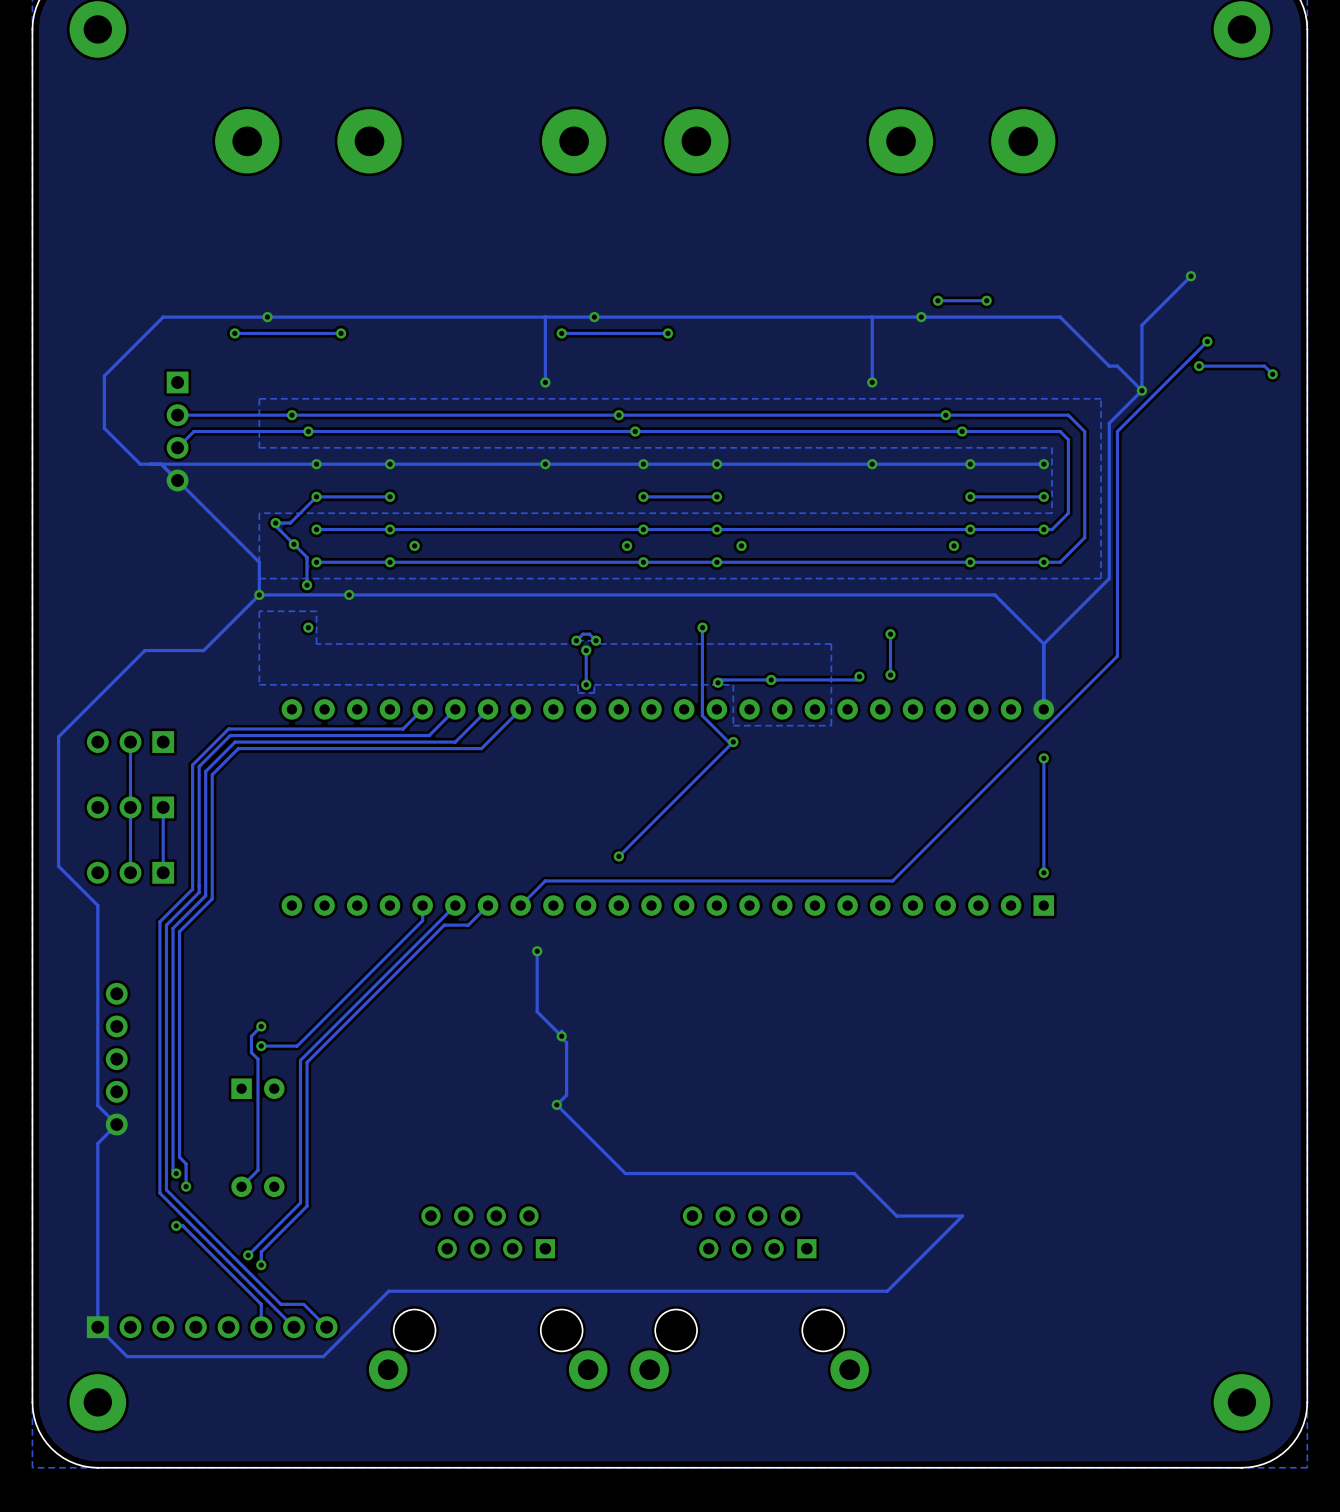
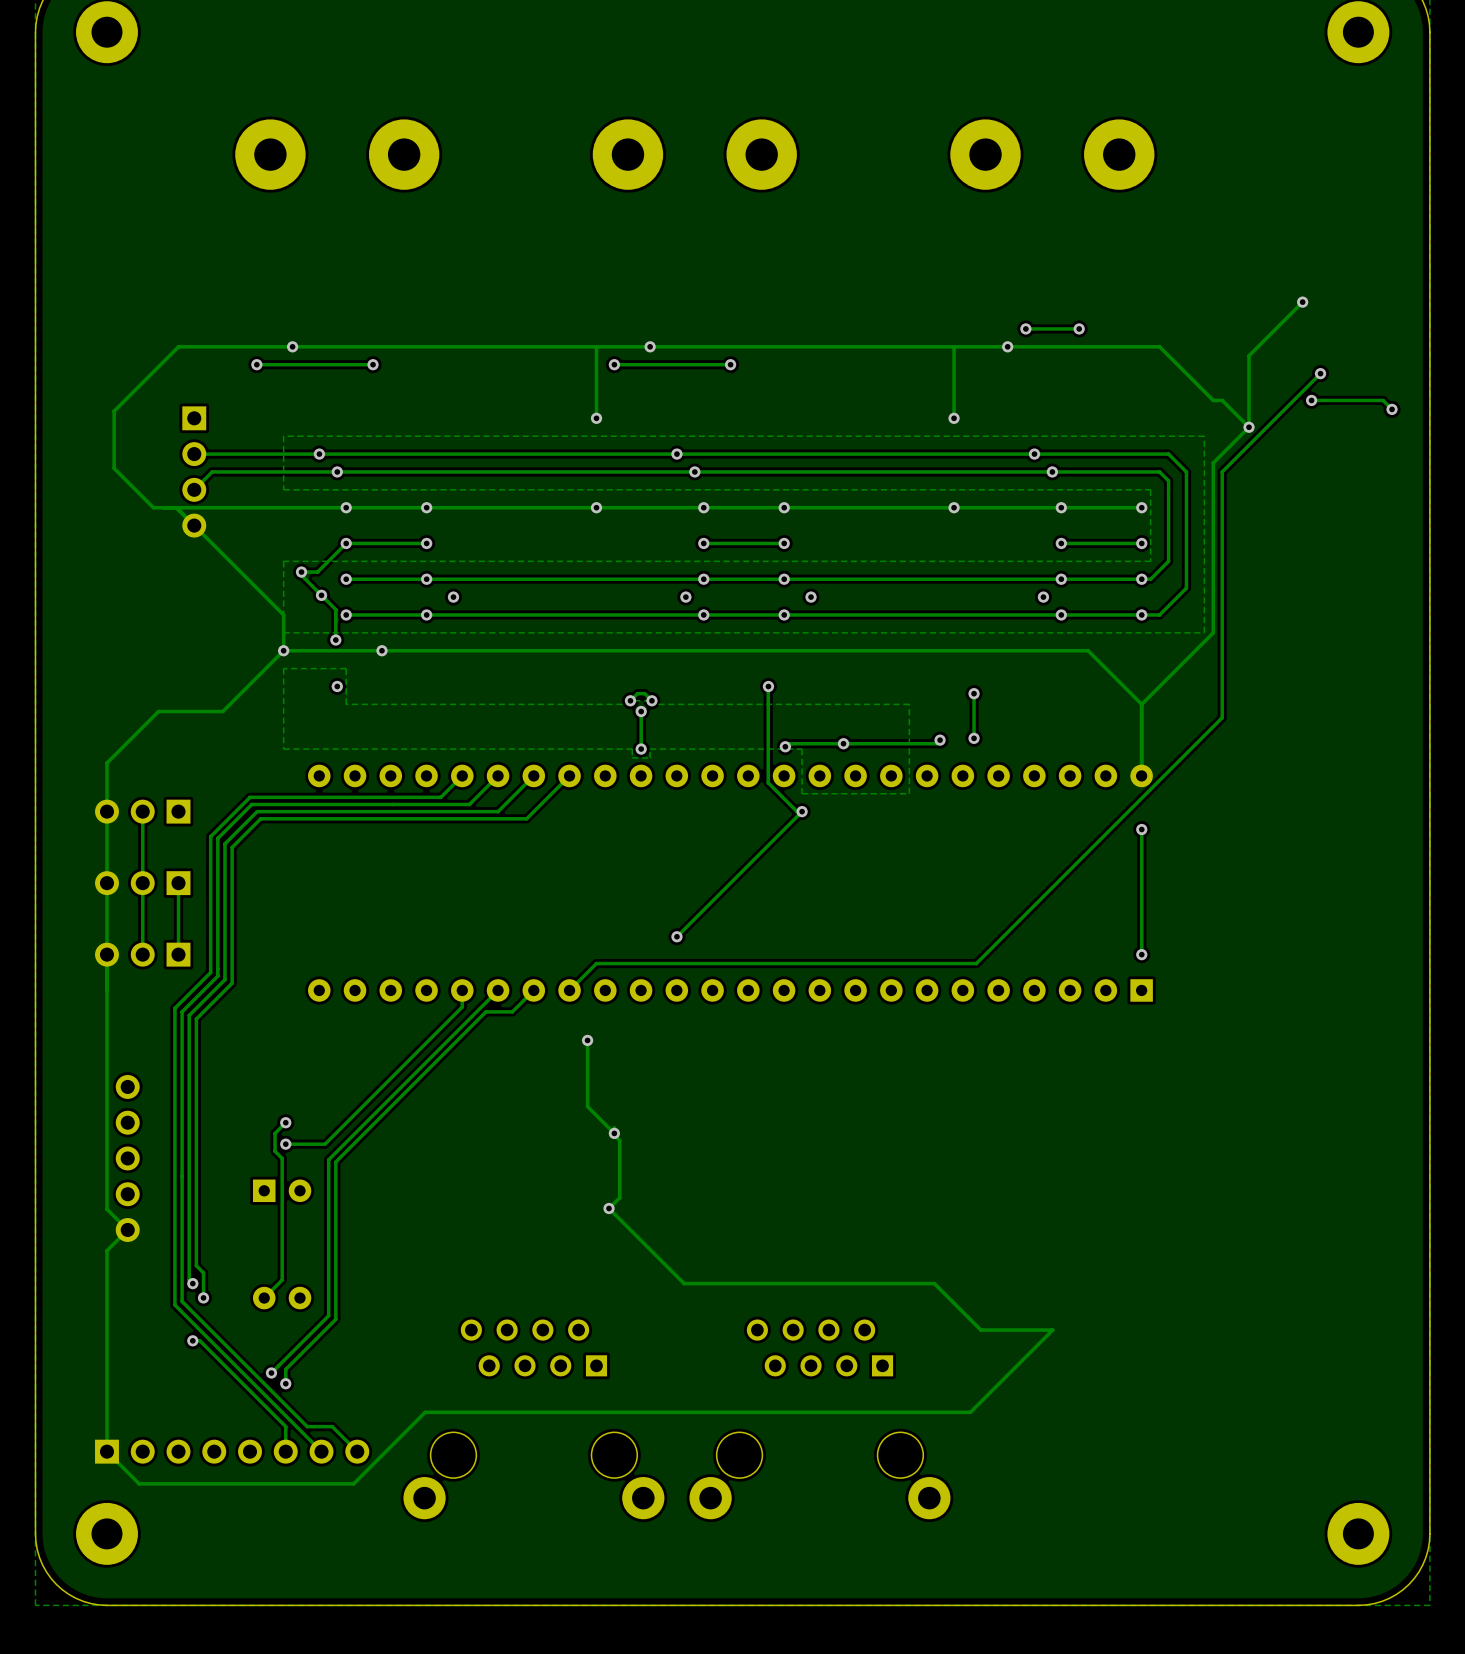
track: (97, 697) (58, 736) (58, 866) (97, 905) -> (106, 763) (106, 990)

